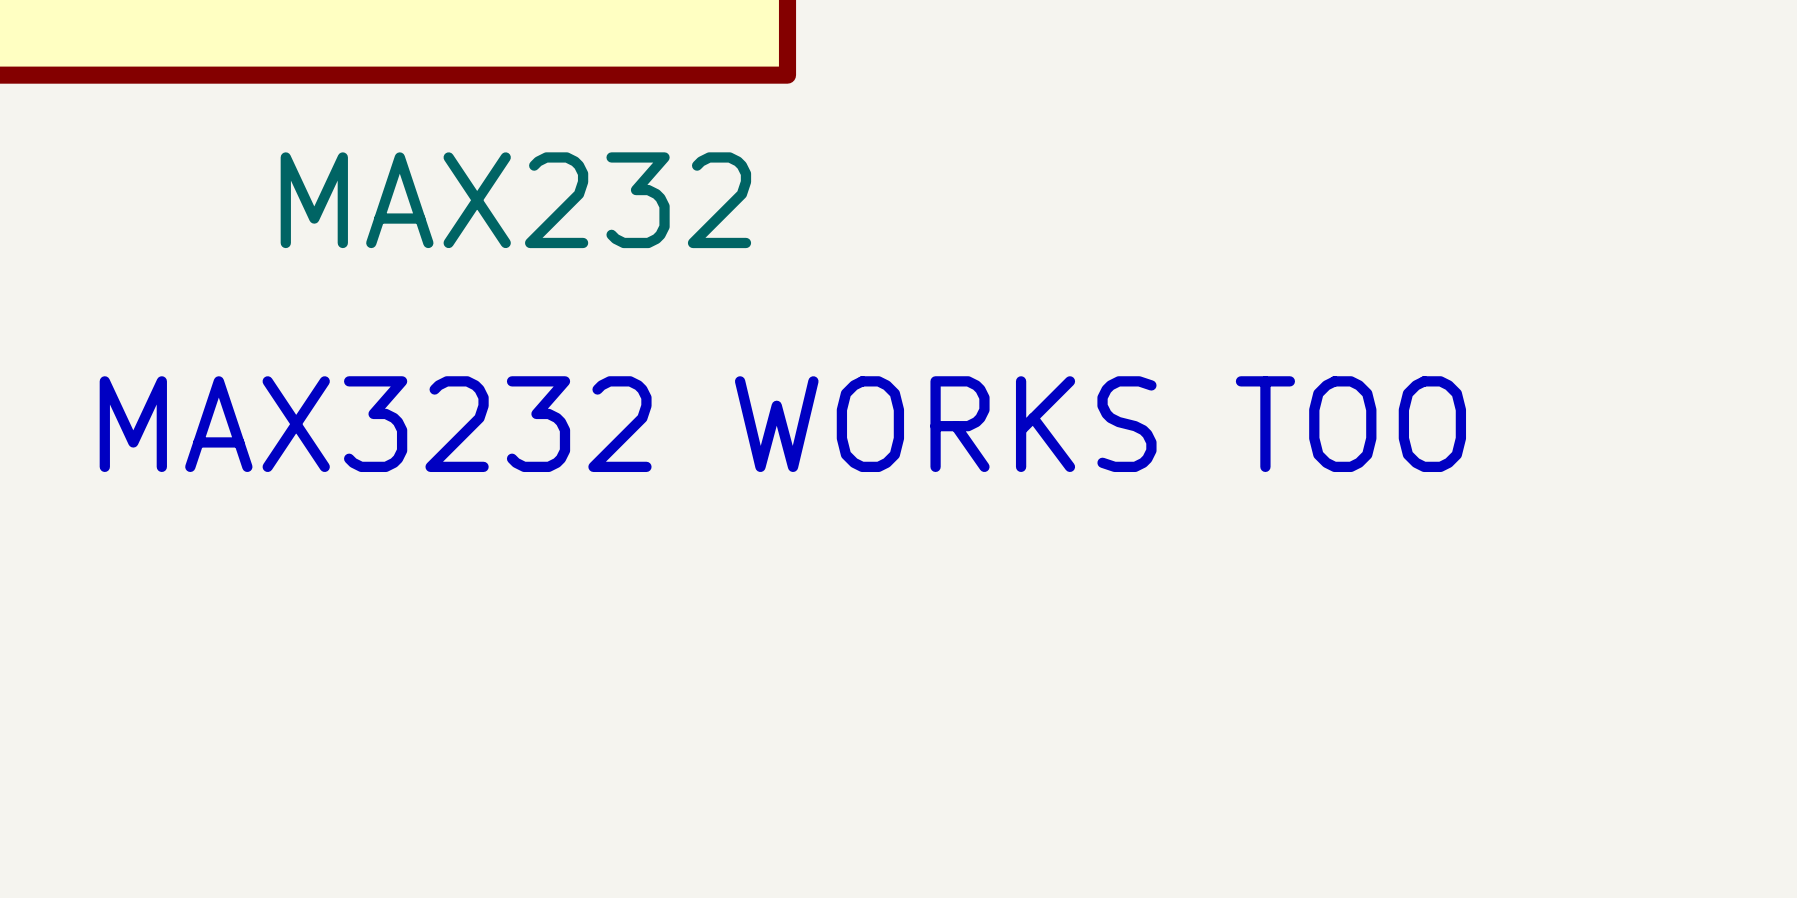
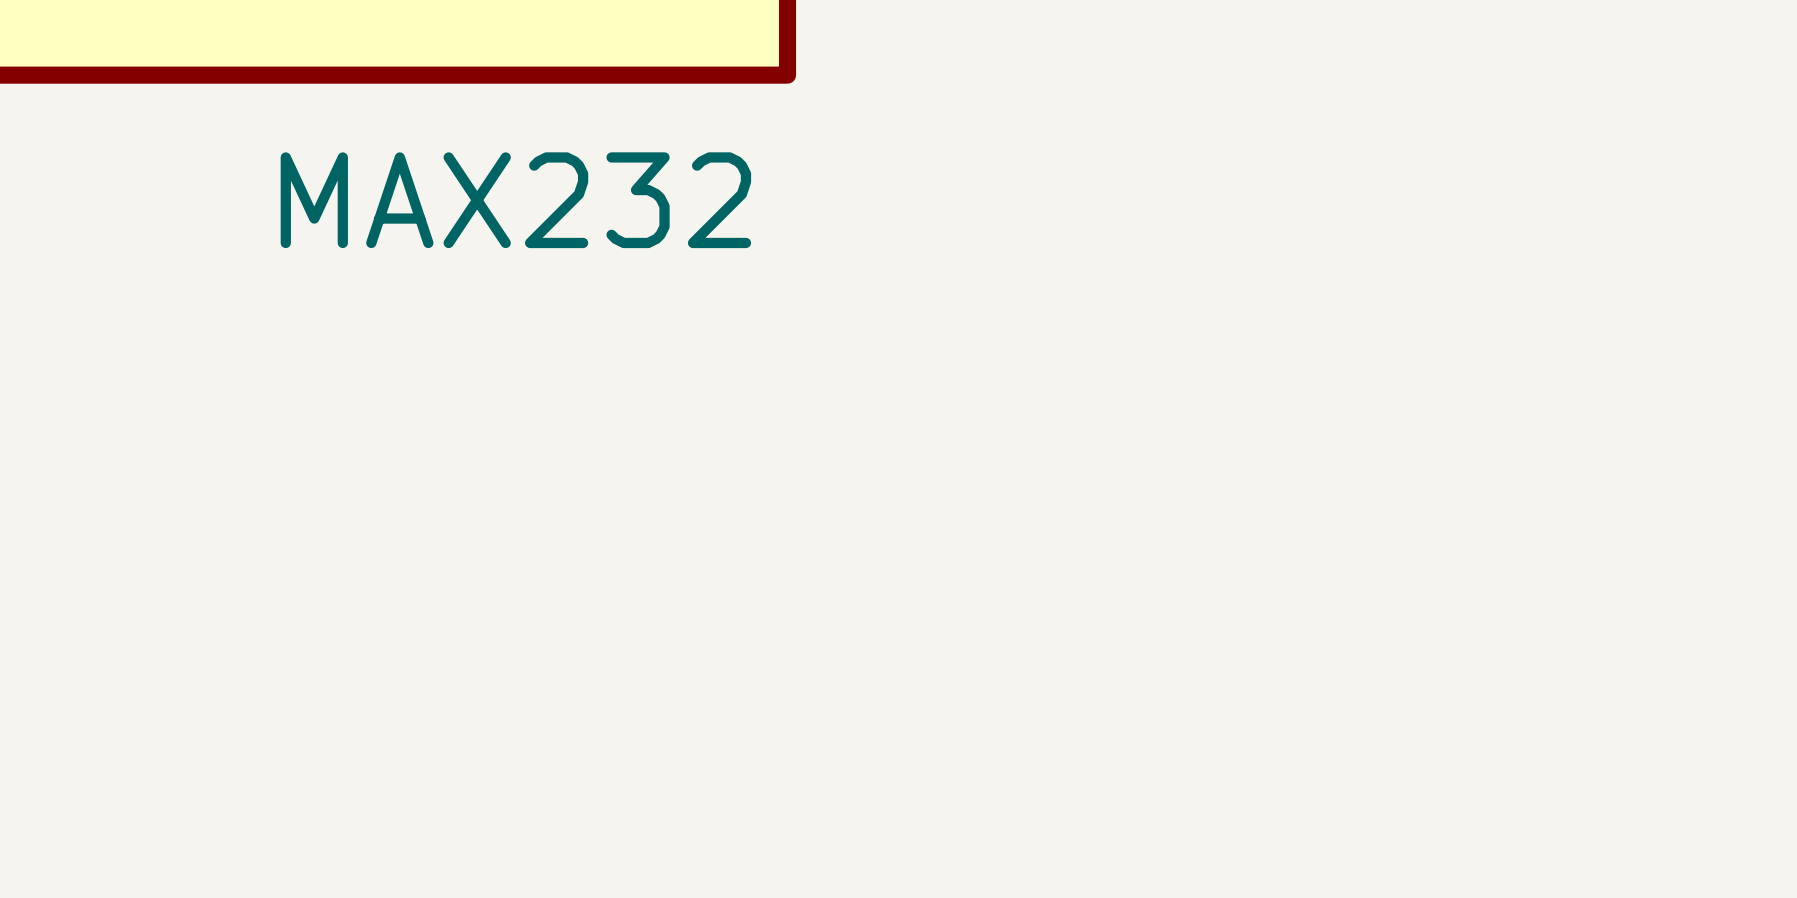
text: MAX3232 WORKS TOO (782, 424) -> none

